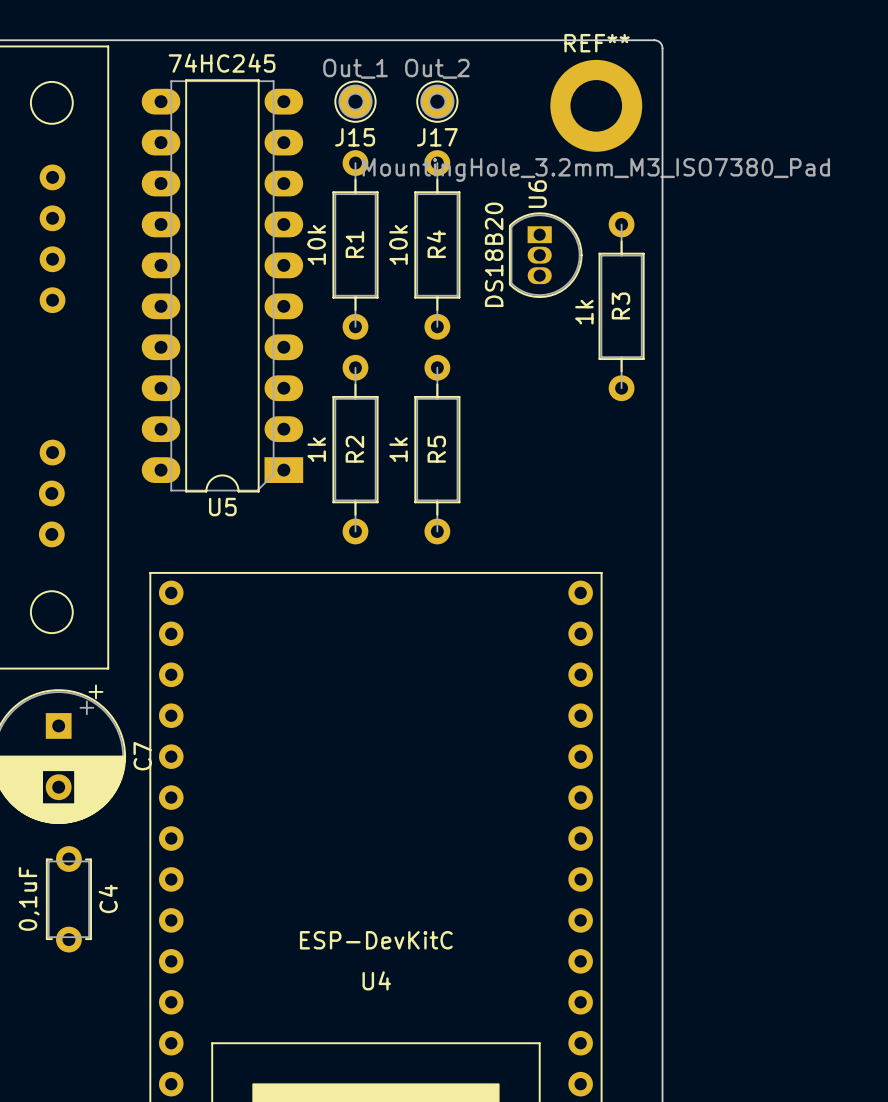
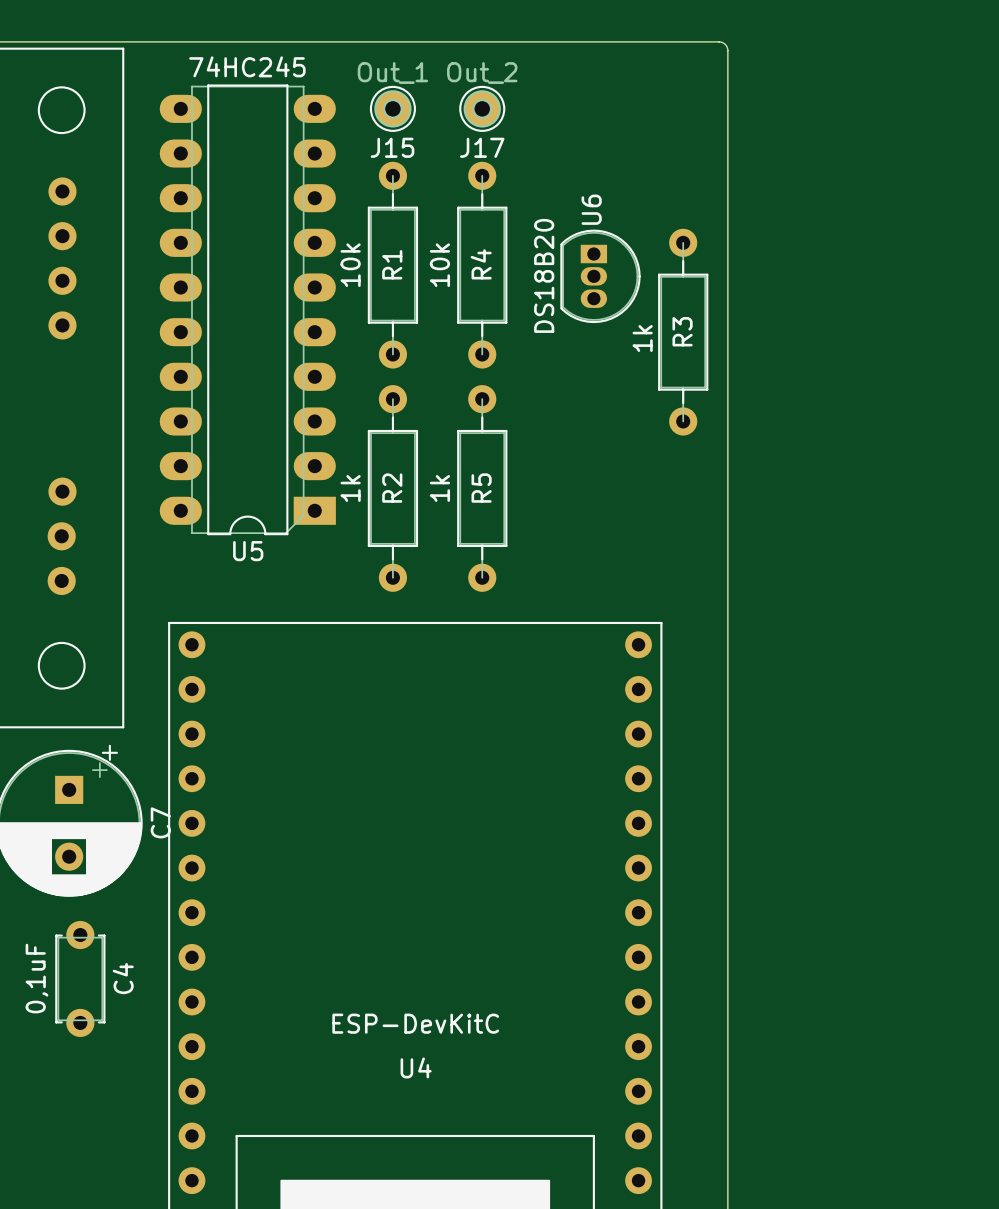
REF**: MountingHole_3.2mm_M3_ISO7380_Pad (596, 105) -> none

